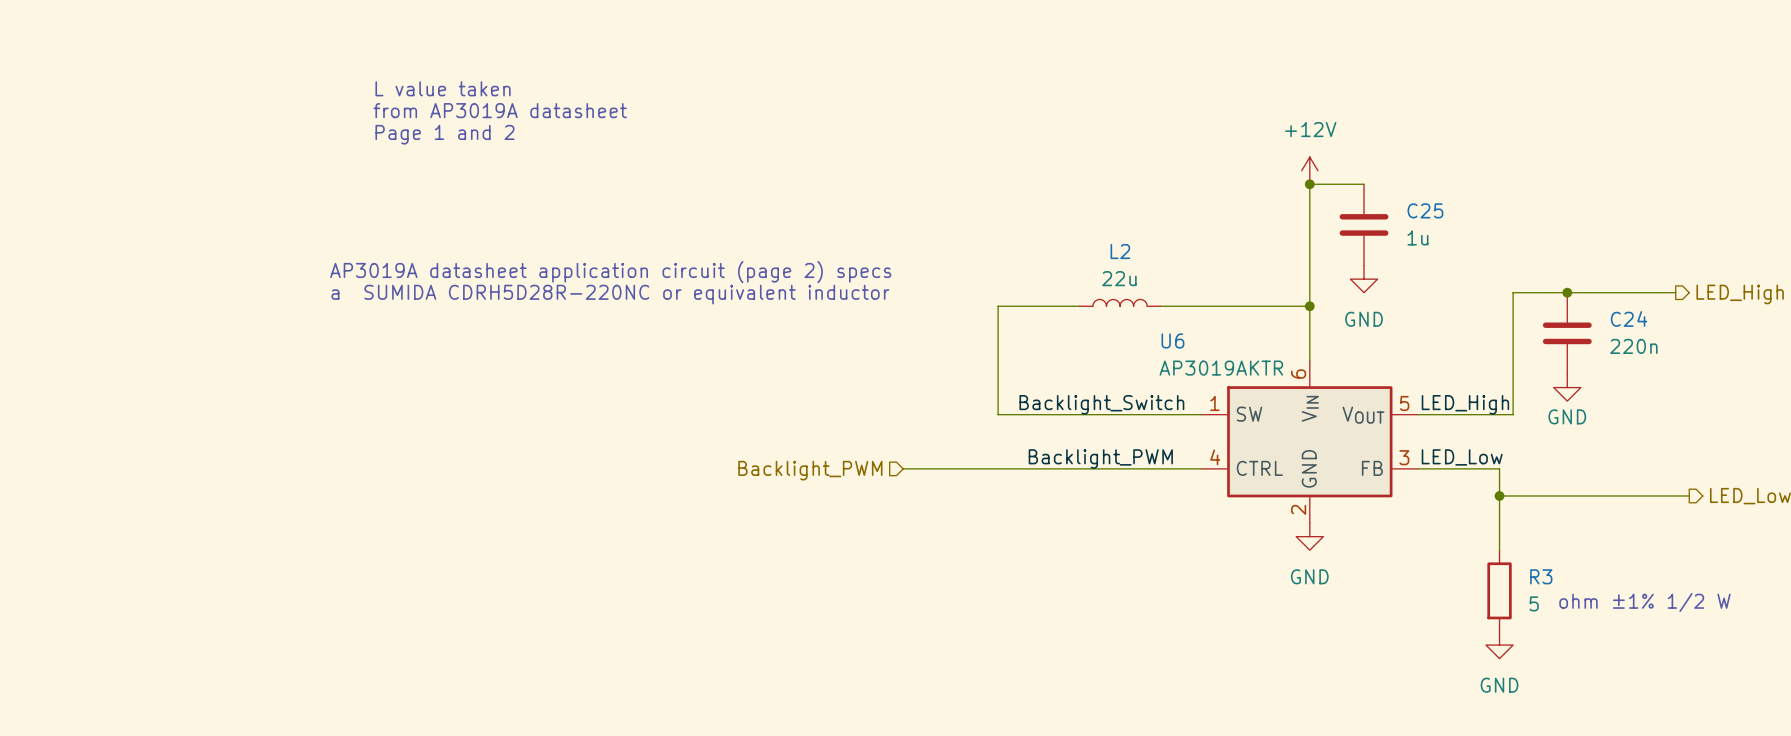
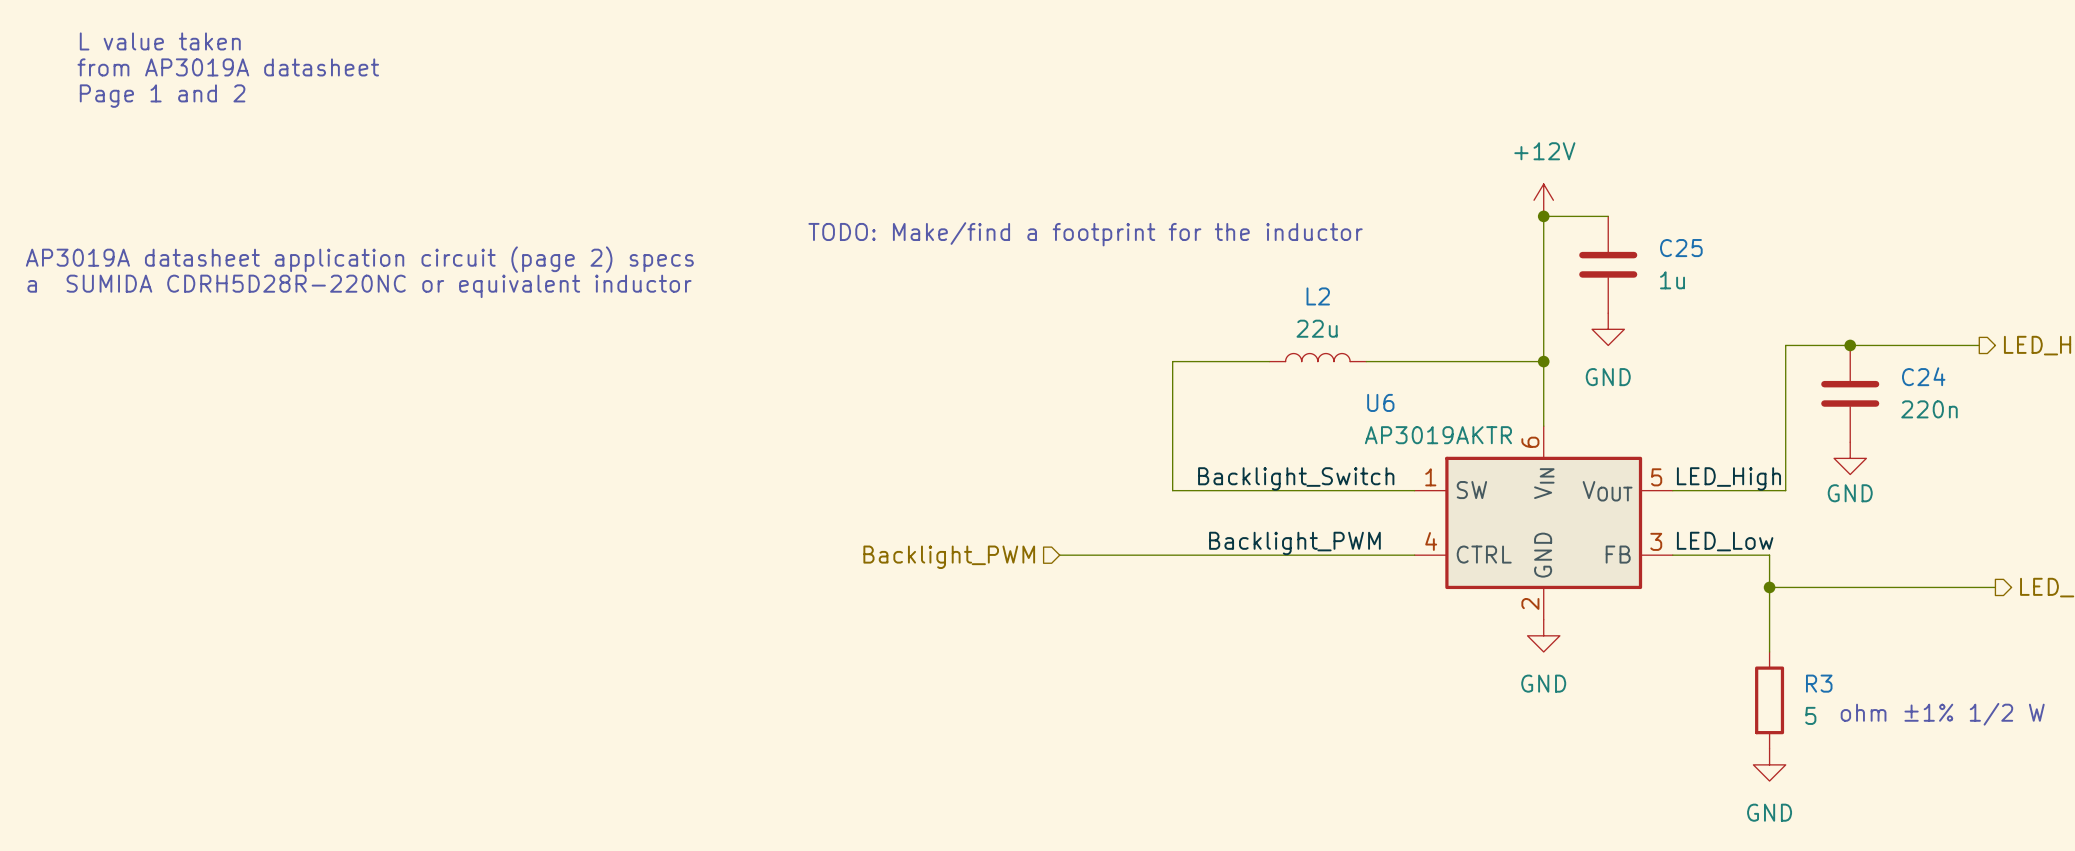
text: none -> L value taken (160, 41)
text: none -> from AP3019A datasheet (228, 67)
text: none -> Page 1 and 2 (162, 96)
text: L value taken (443, 88) -> none
text: from AP3019A datasheet (500, 110) -> none
text: Page 1 and 2 (444, 134) -> none
text: none -> TODO: Make/find a footprint for the inductor (1085, 234)
text: none -> AP3019A datasheet application circuit (page 2) specs (359, 259)
text: none -> a SUMIDA CDRH5D28R-220NC or equivalent inductor (359, 286)
text: AP3019A datasheet application circuit (page 2) specs (610, 272) -> none
text: a SUMIDA CDRH5D28R-220NC or equivalent inductor (610, 294) -> none

